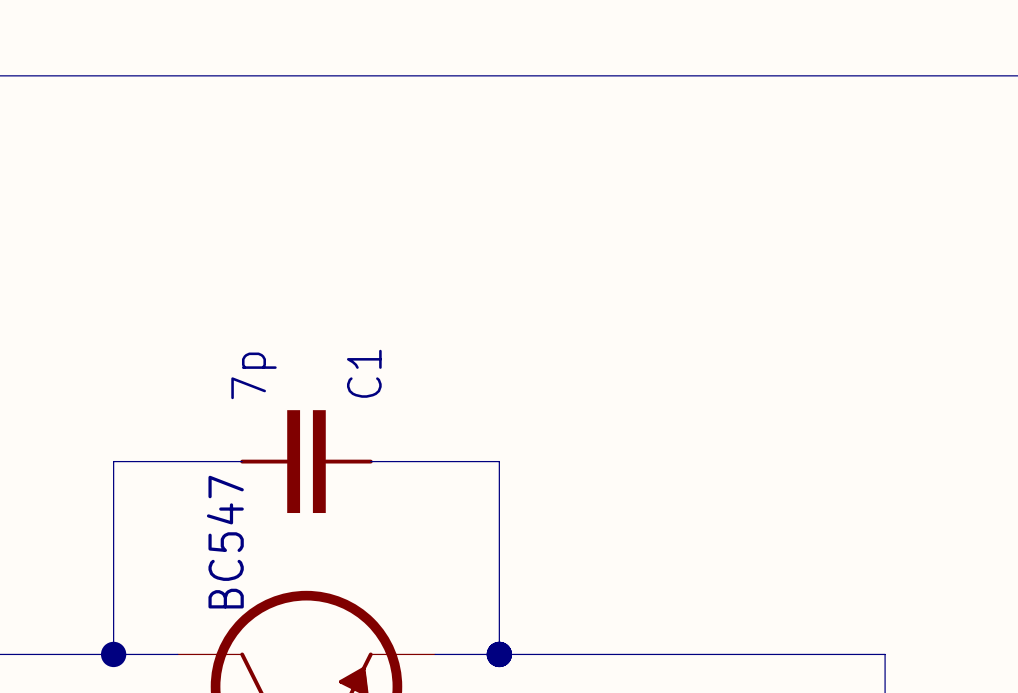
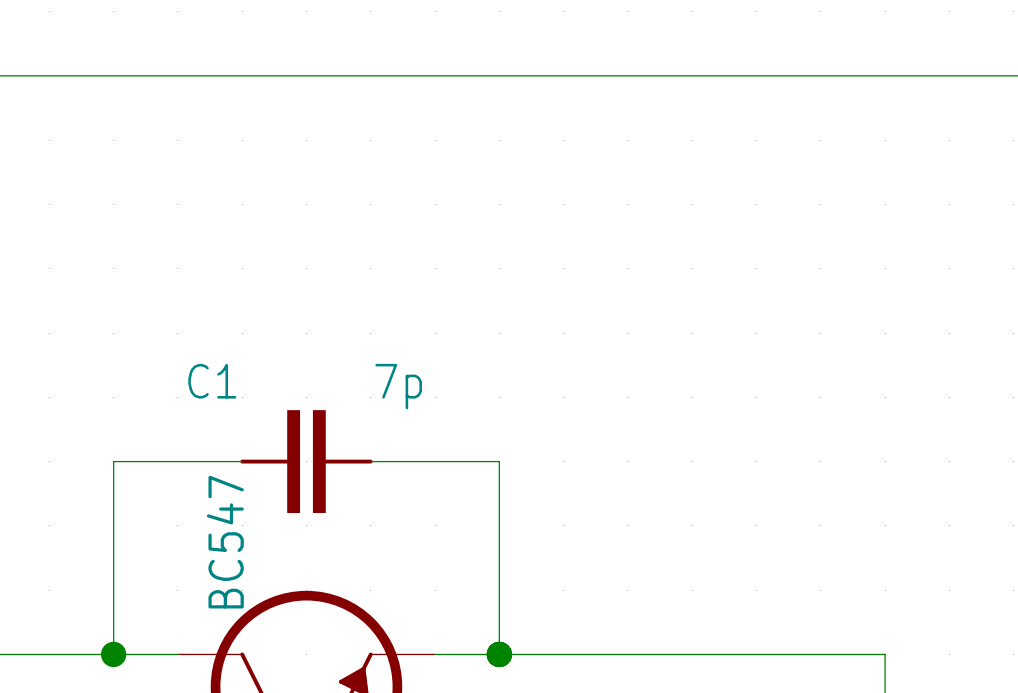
C1 name rotation: 0° (364, 373) -> 90° clockwise (212, 381)
C1 name position: C1 (364, 373) -> C1 (212, 381)
C1 value rotation: 0° (253, 375) -> 90° clockwise (398, 386)
C1 value position: 7p (253, 375) -> 7p (398, 386)

